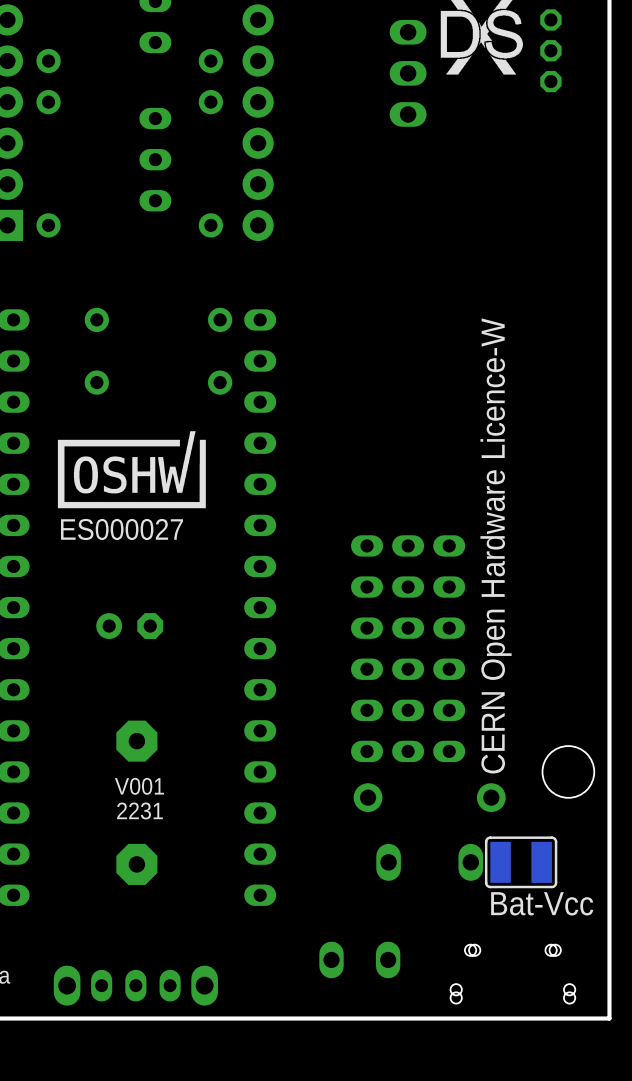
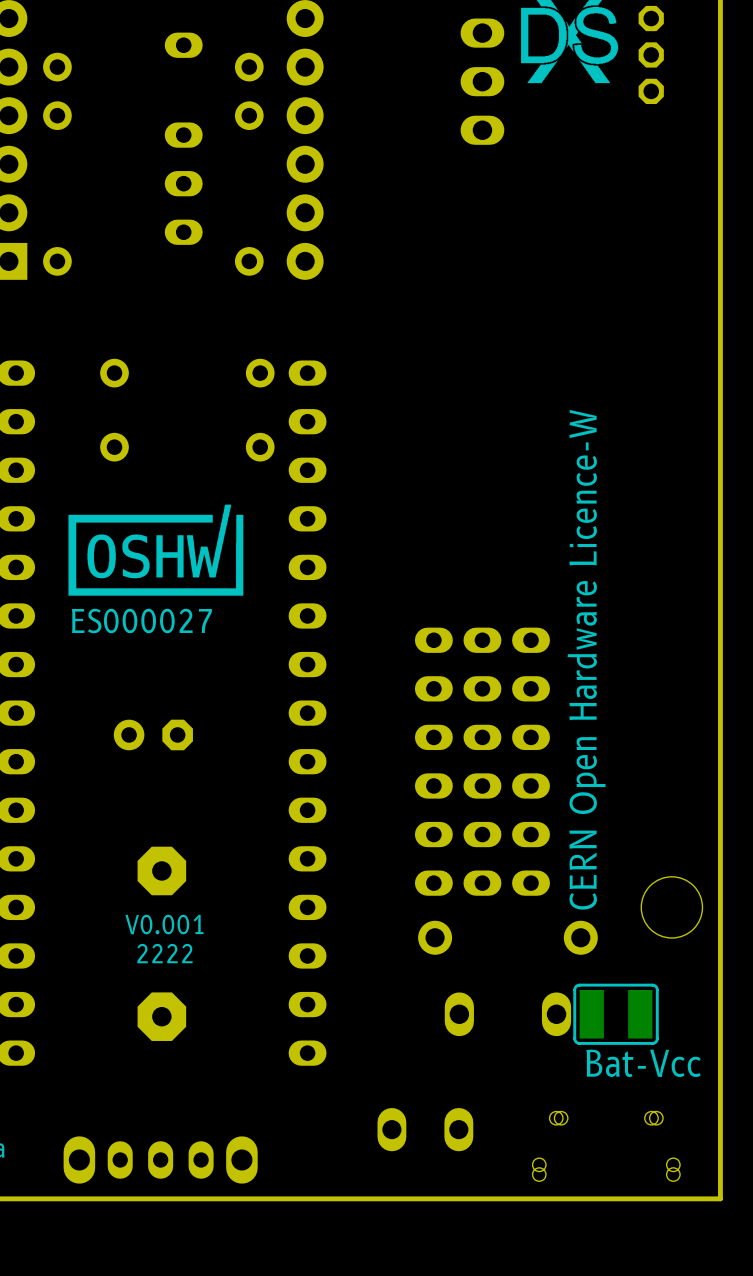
text: V001 (139, 786) -> V0.001 (164, 924)
text: 2231 (139, 810) -> 2222 (164, 953)

